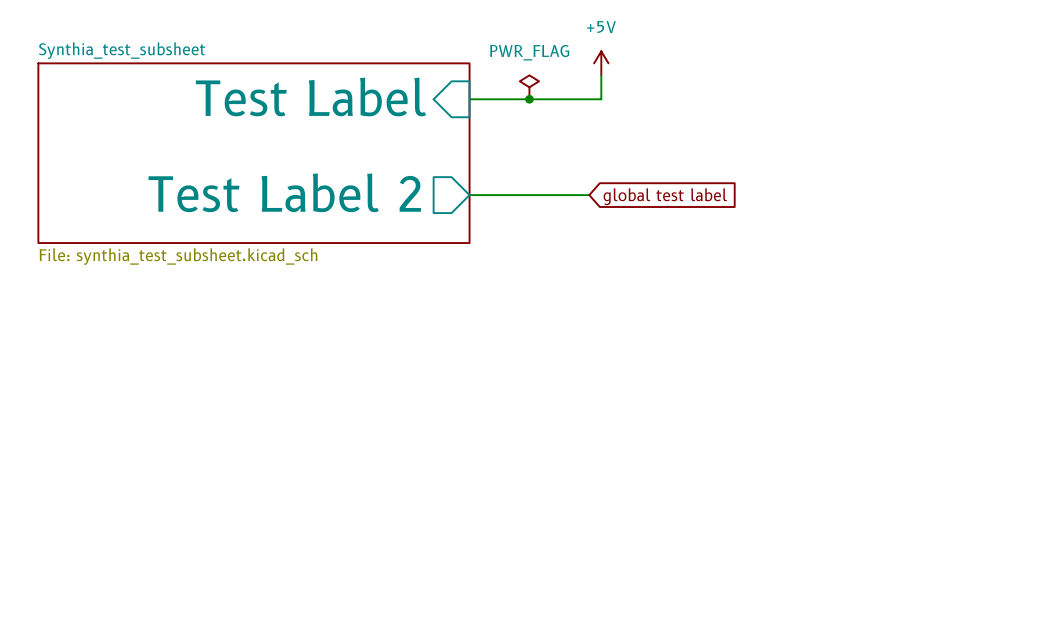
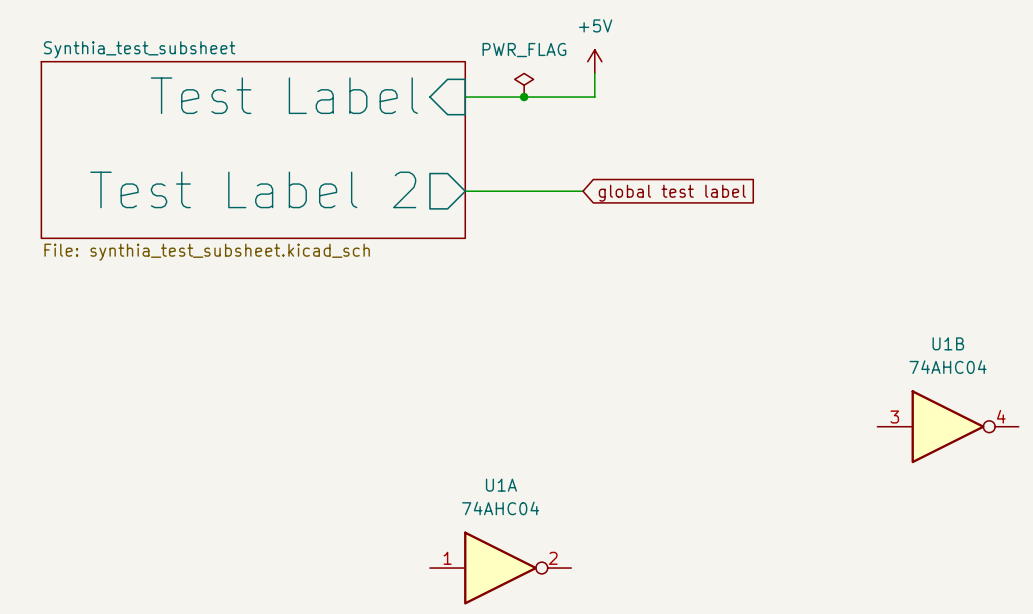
U1B: none -> 74AHC04 (948, 426)
U1A: none -> 74AHC04 (500, 568)

